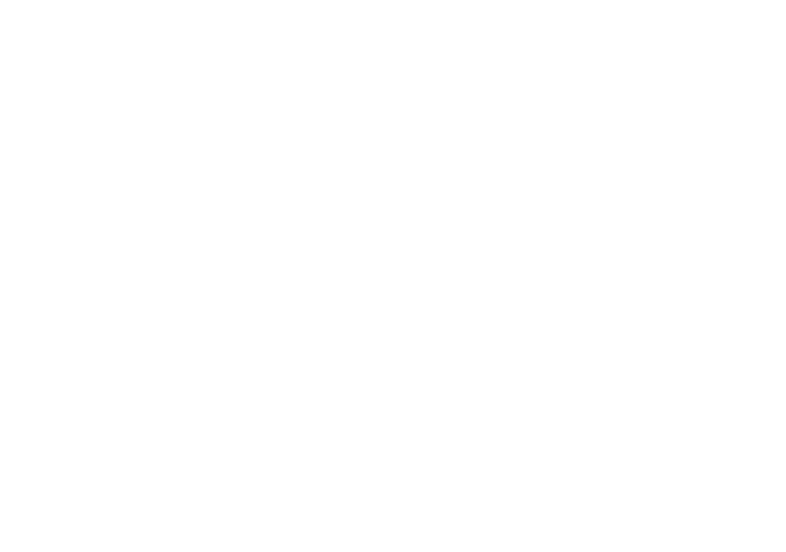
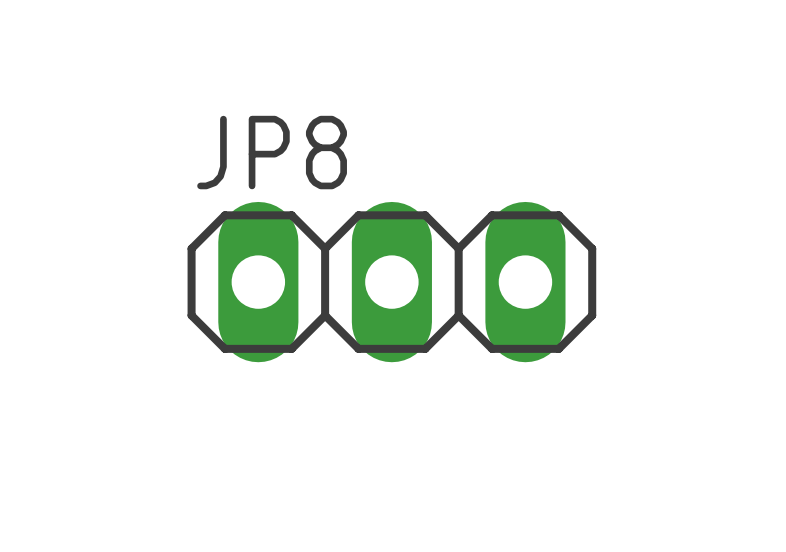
JP8: none -> (391, 282)

